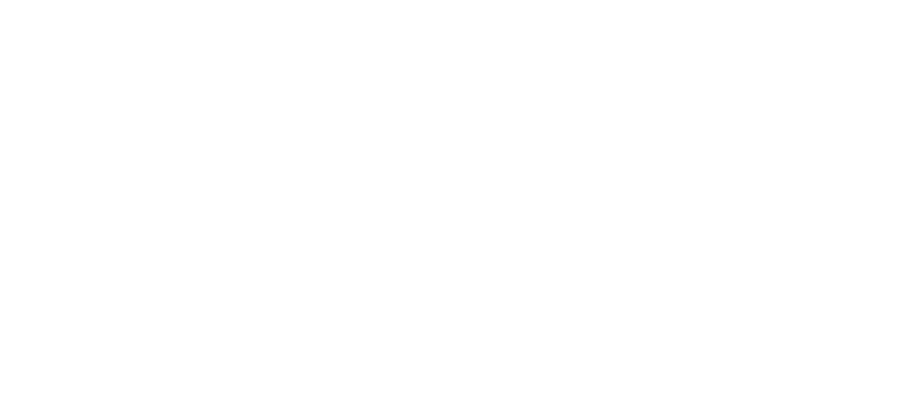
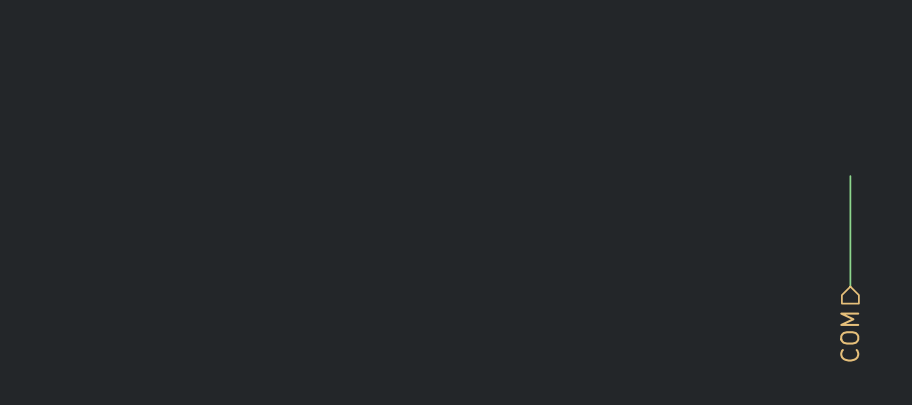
wire: none -> (850, 176) (850, 286)
hierarchical label: none -> COM (849, 337)

